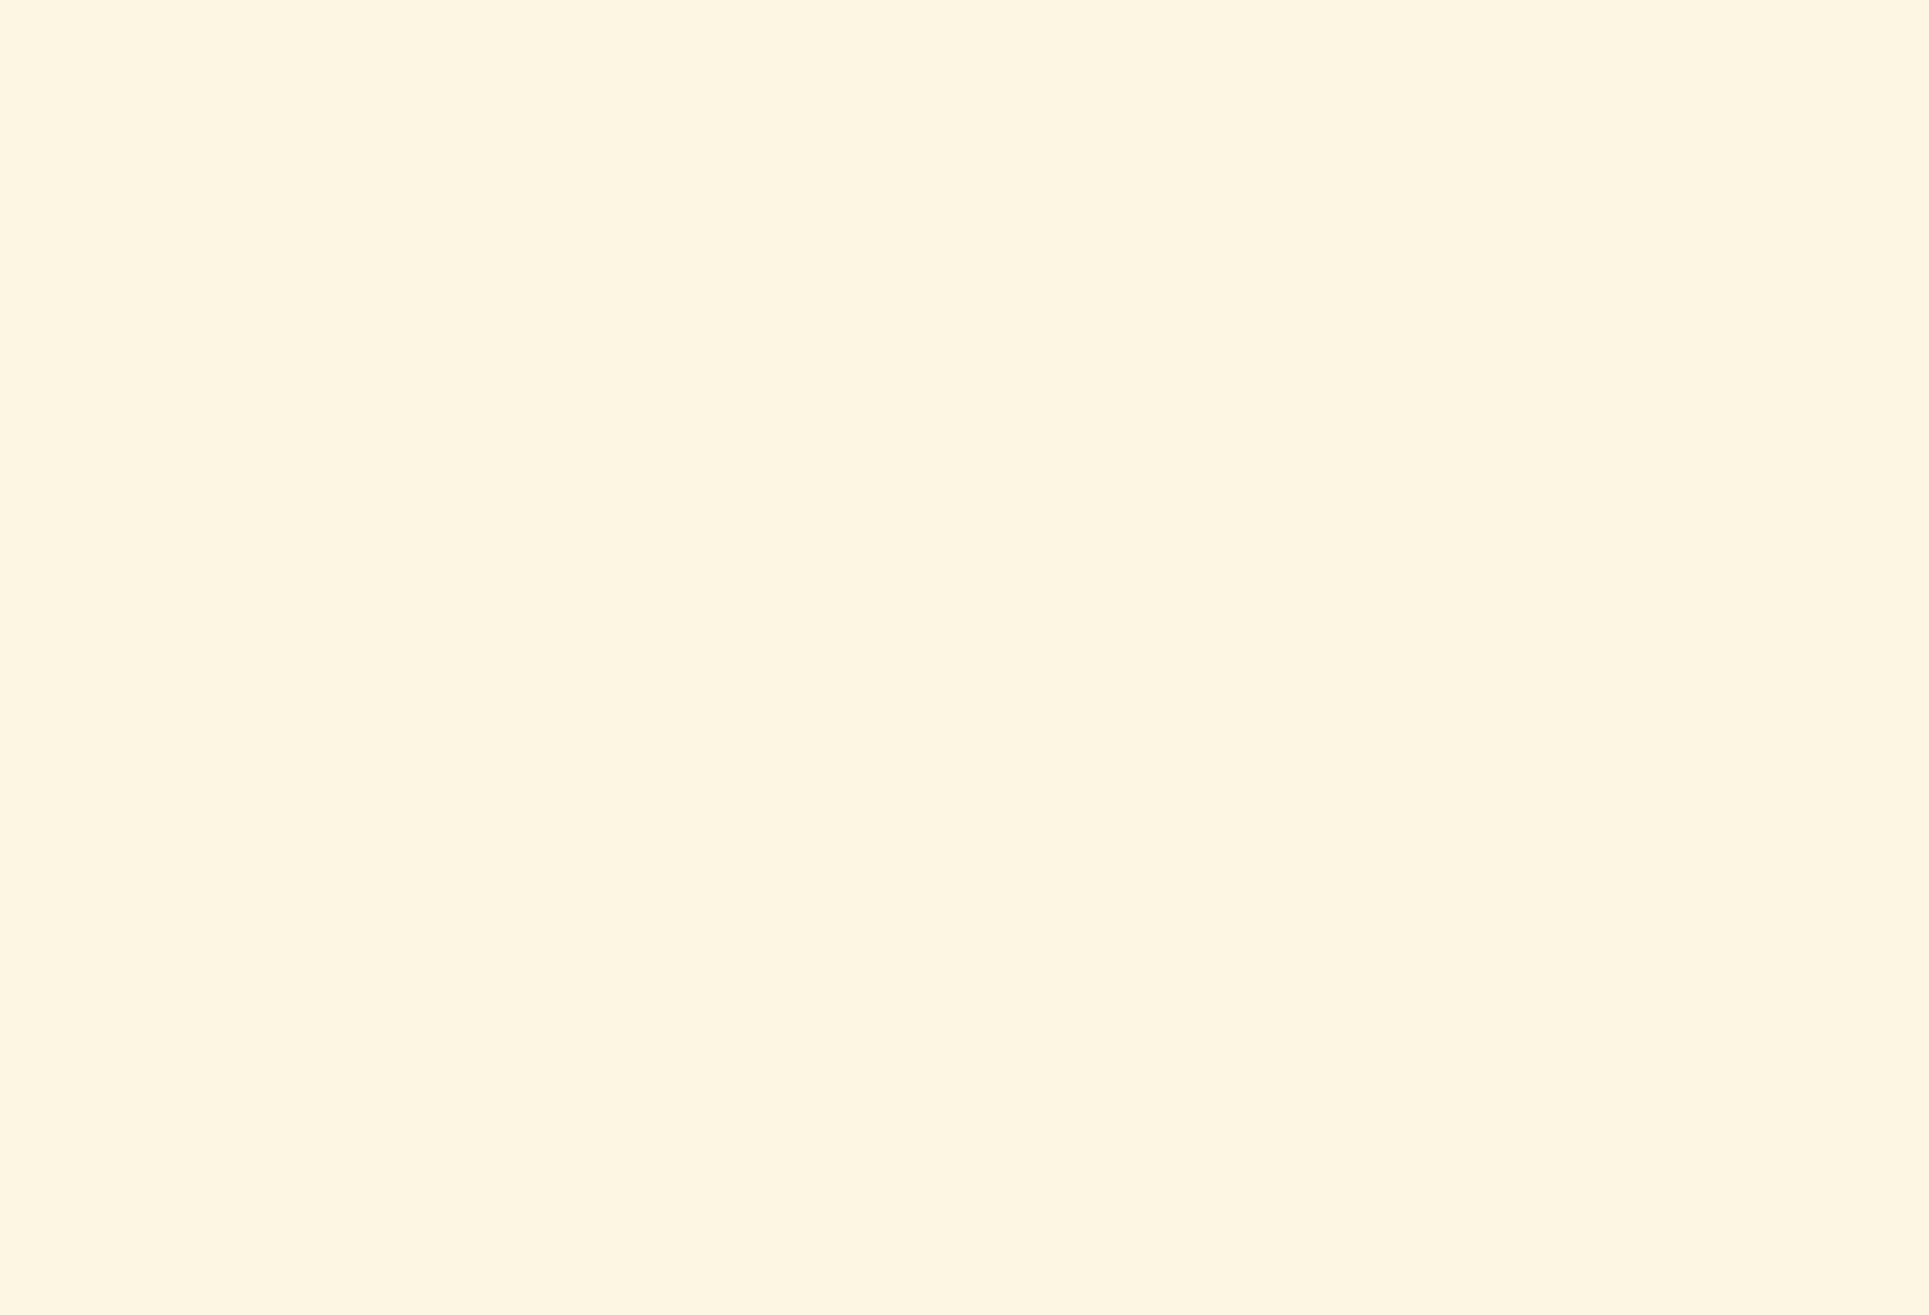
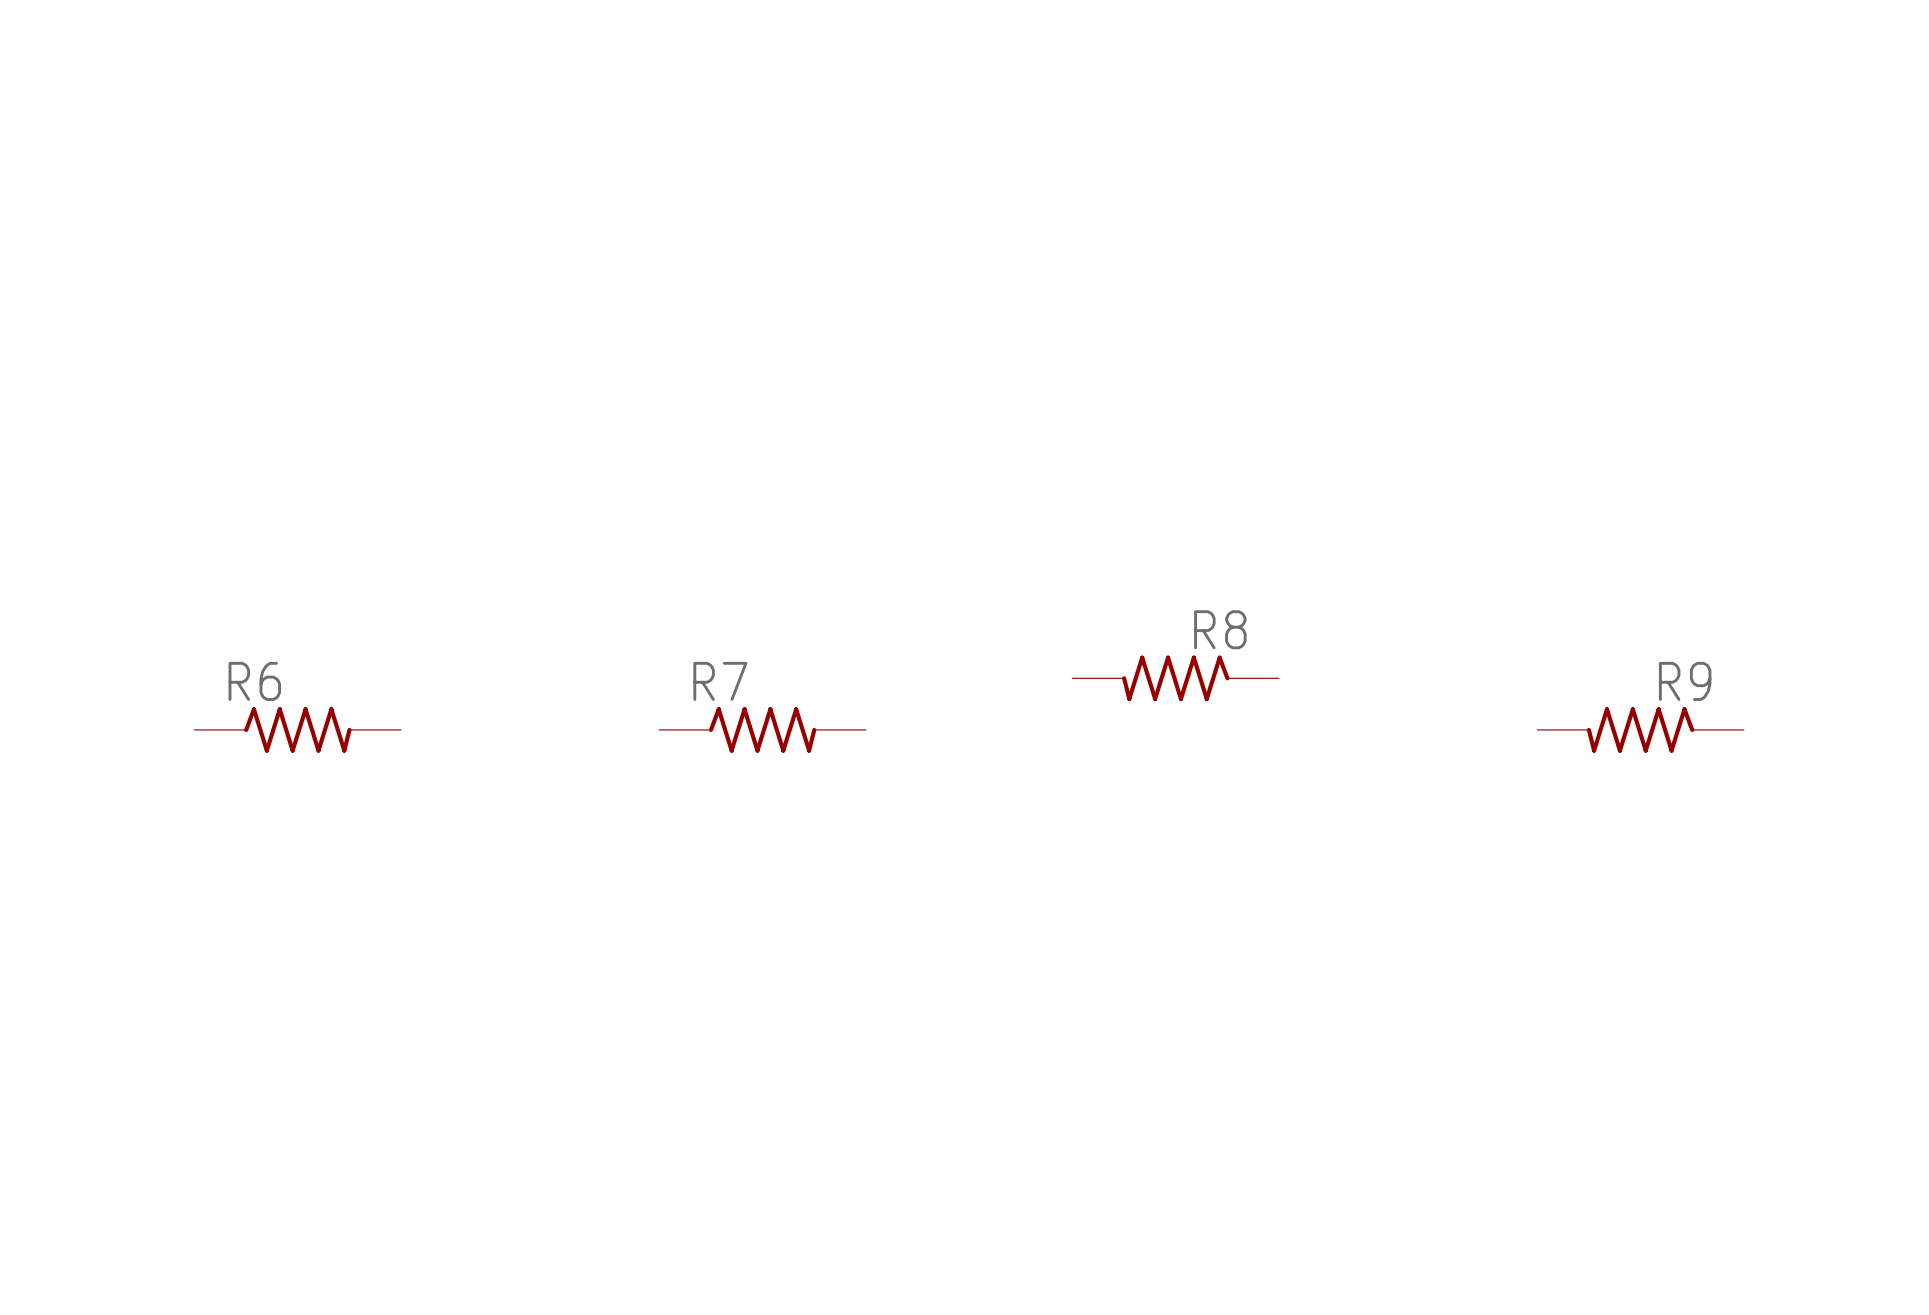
R8: none -> (1175, 678)
R6: none -> (297, 729)
R7: none -> (762, 729)
R9: none -> (1640, 729)

